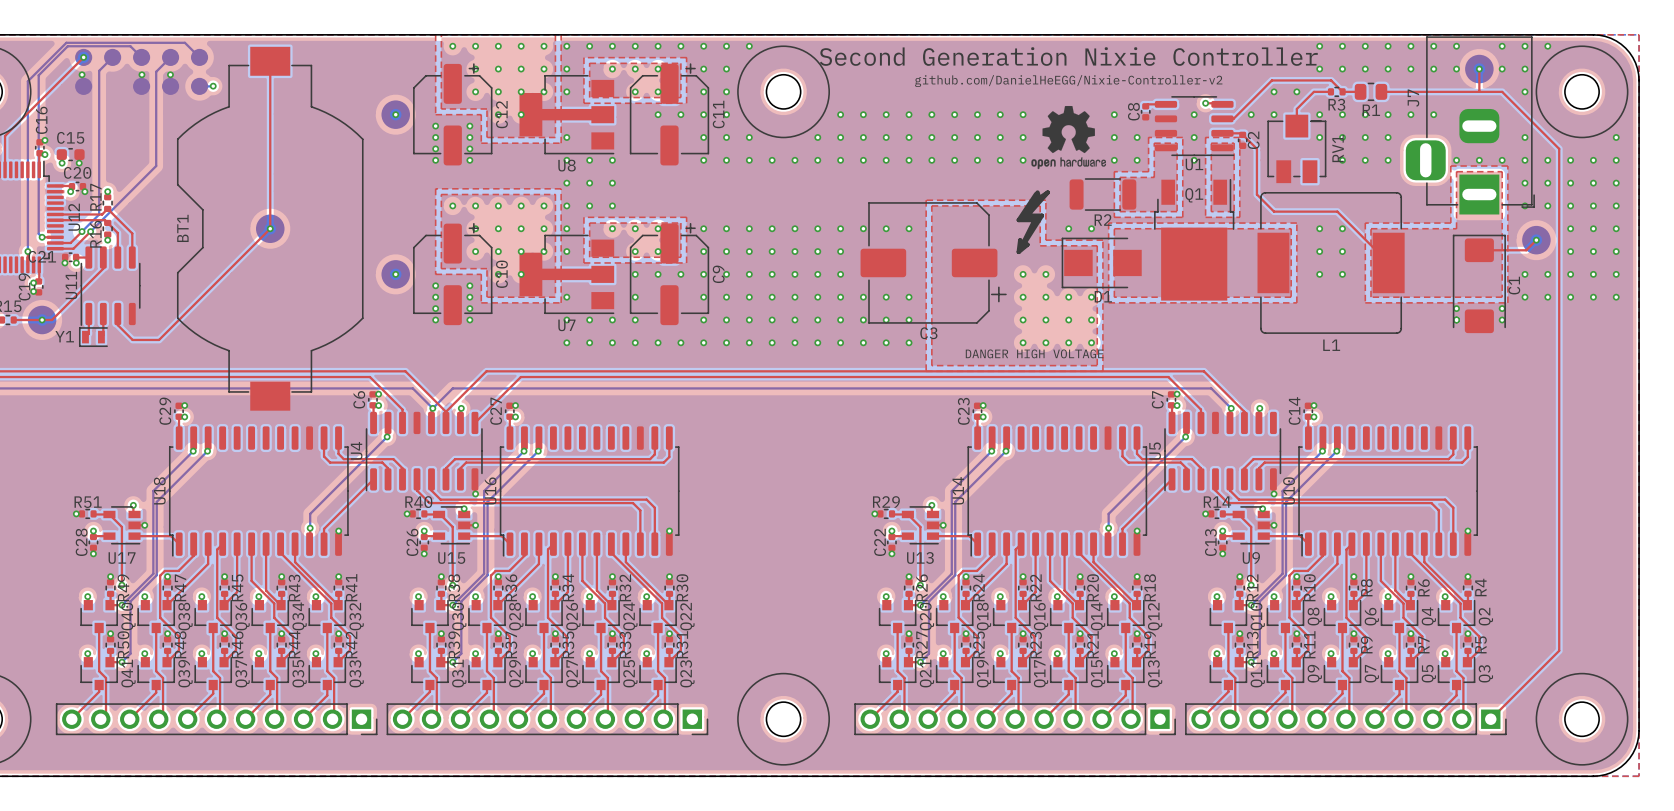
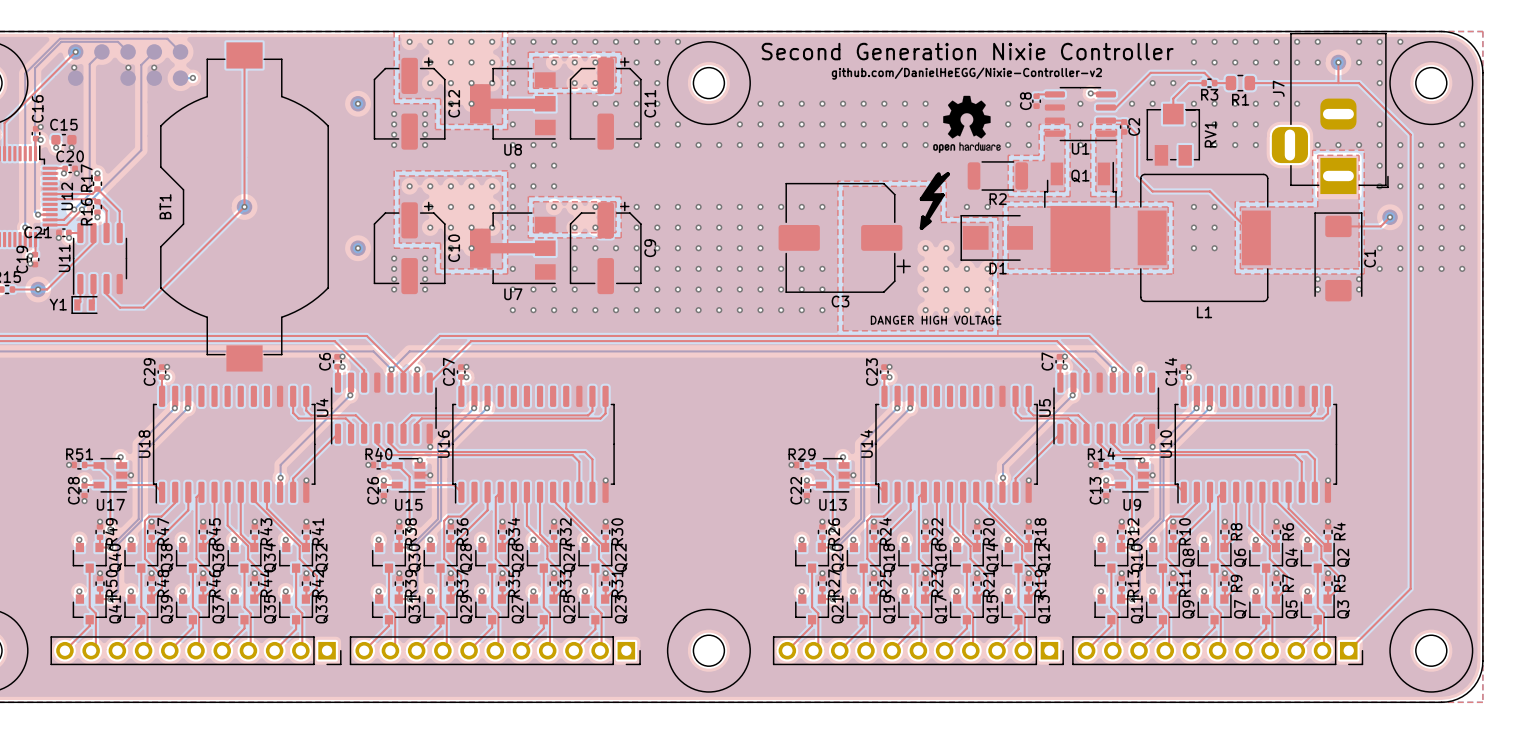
part footprint: [1465, 54, 1494, 84] -> [1330, 54, 1347, 71]
part footprint: [381, 100, 410, 129] -> [350, 96, 366, 112]
part footprint: [256, 214, 285, 244] -> [236, 199, 253, 215]
part footprint: [1522, 225, 1551, 255] -> [1382, 209, 1398, 226]
part footprint: [381, 260, 410, 289] -> [350, 240, 366, 256]
part footprint: [27, 305, 57, 335] -> [30, 281, 46, 298]

